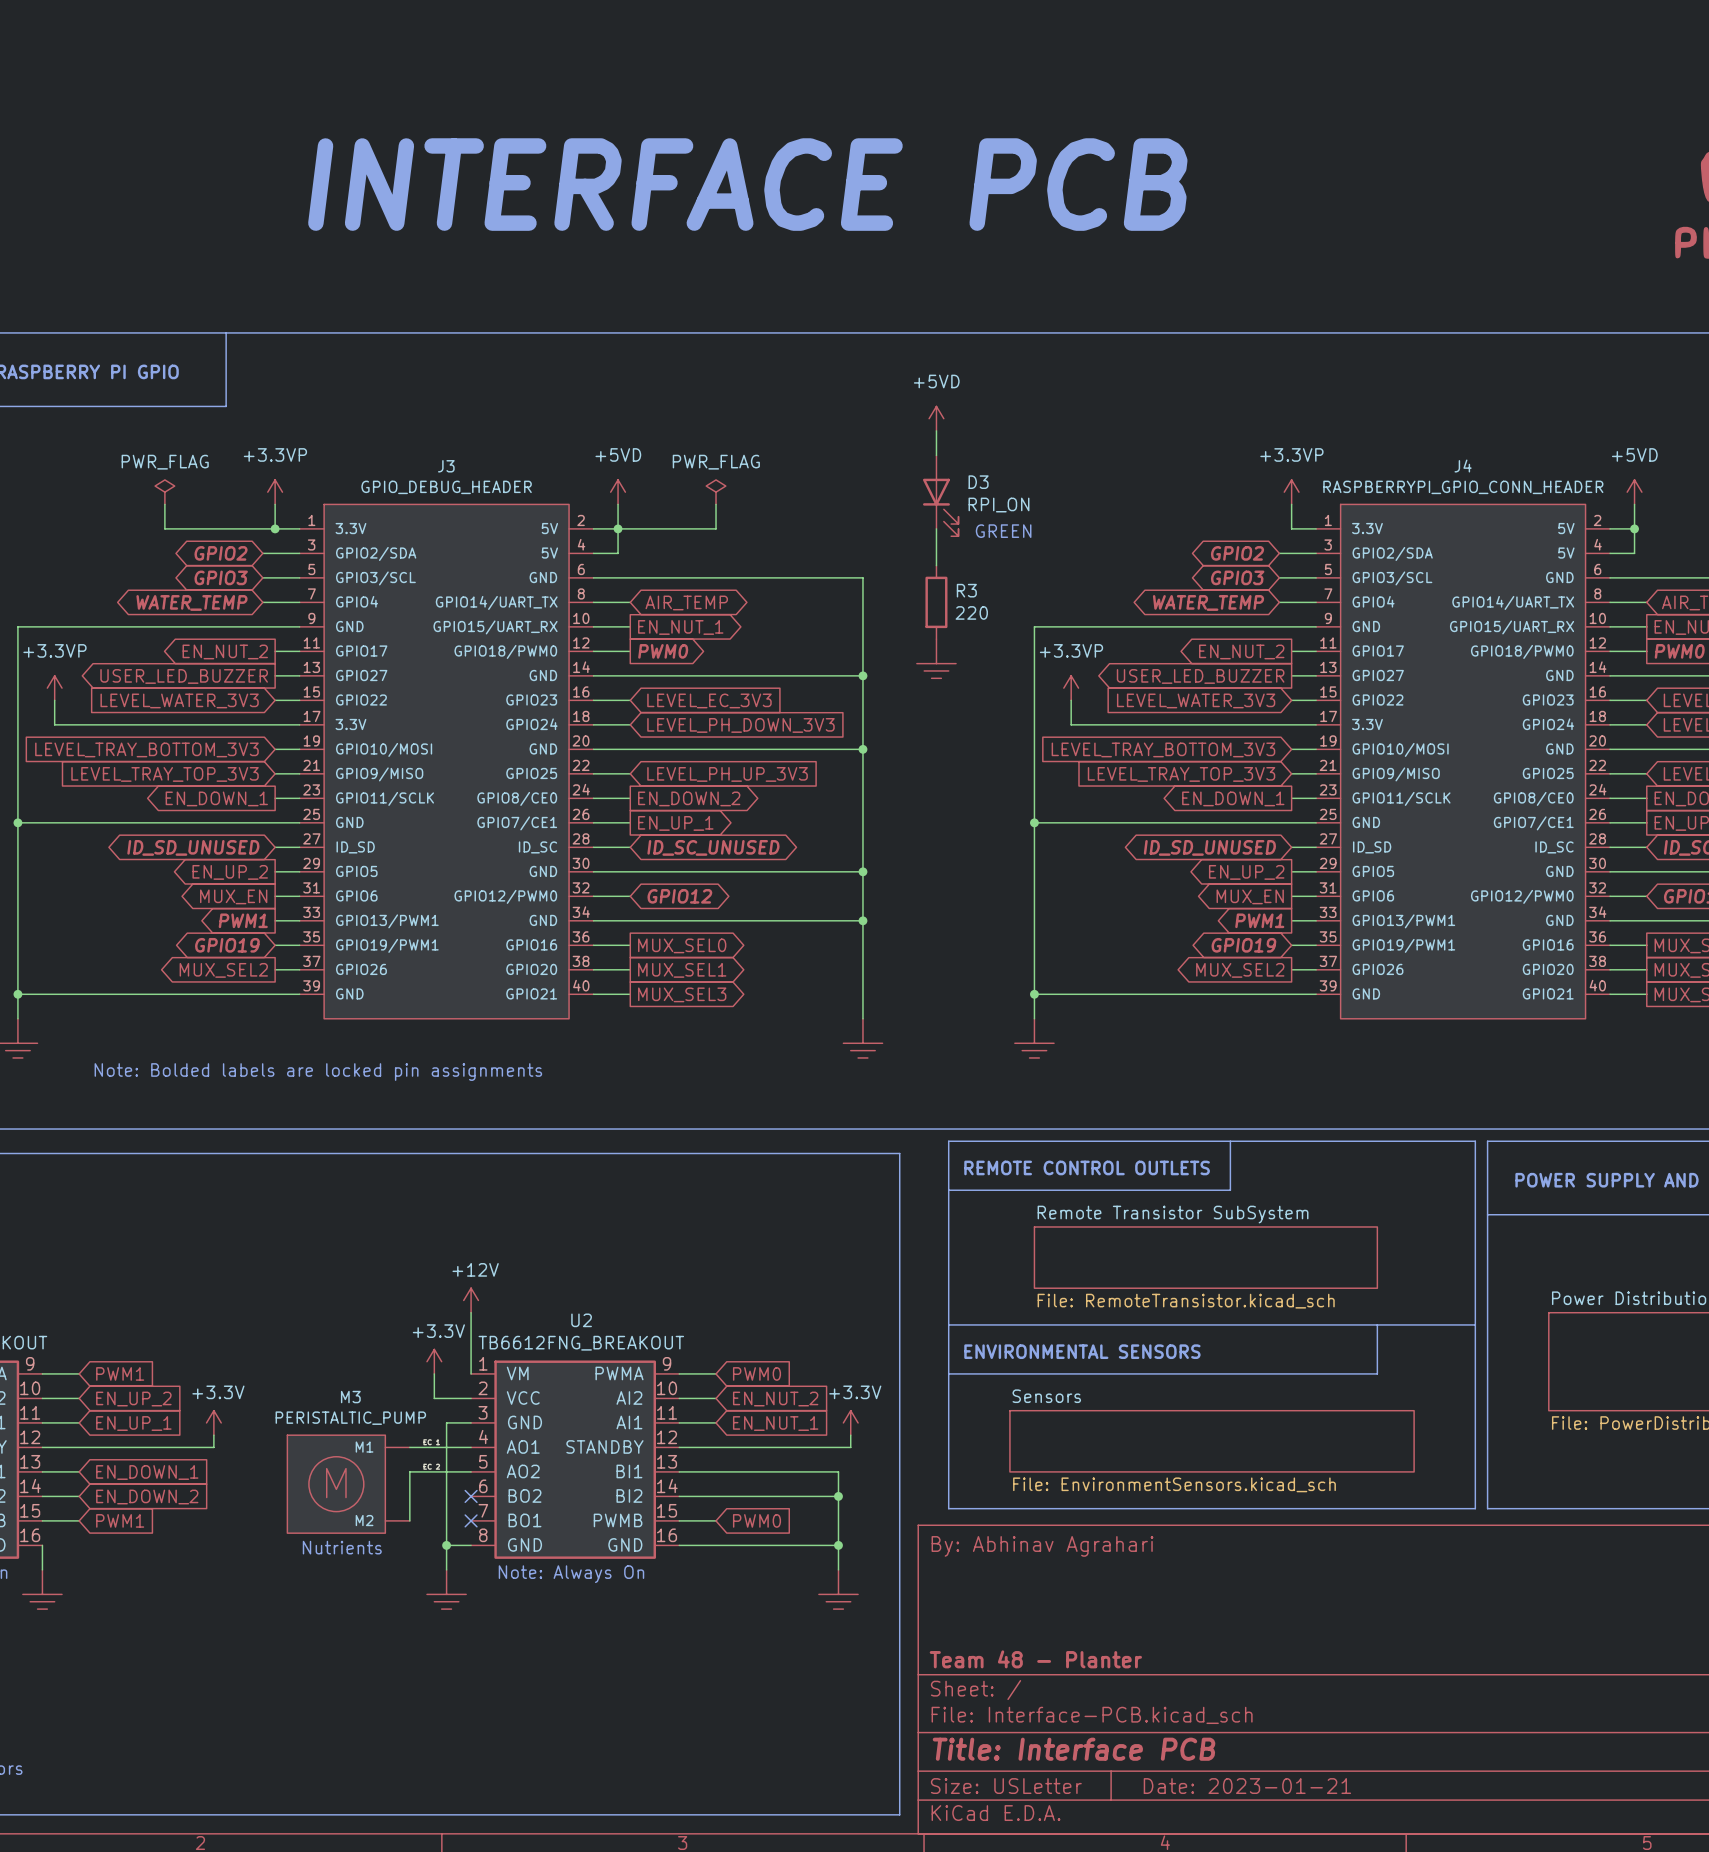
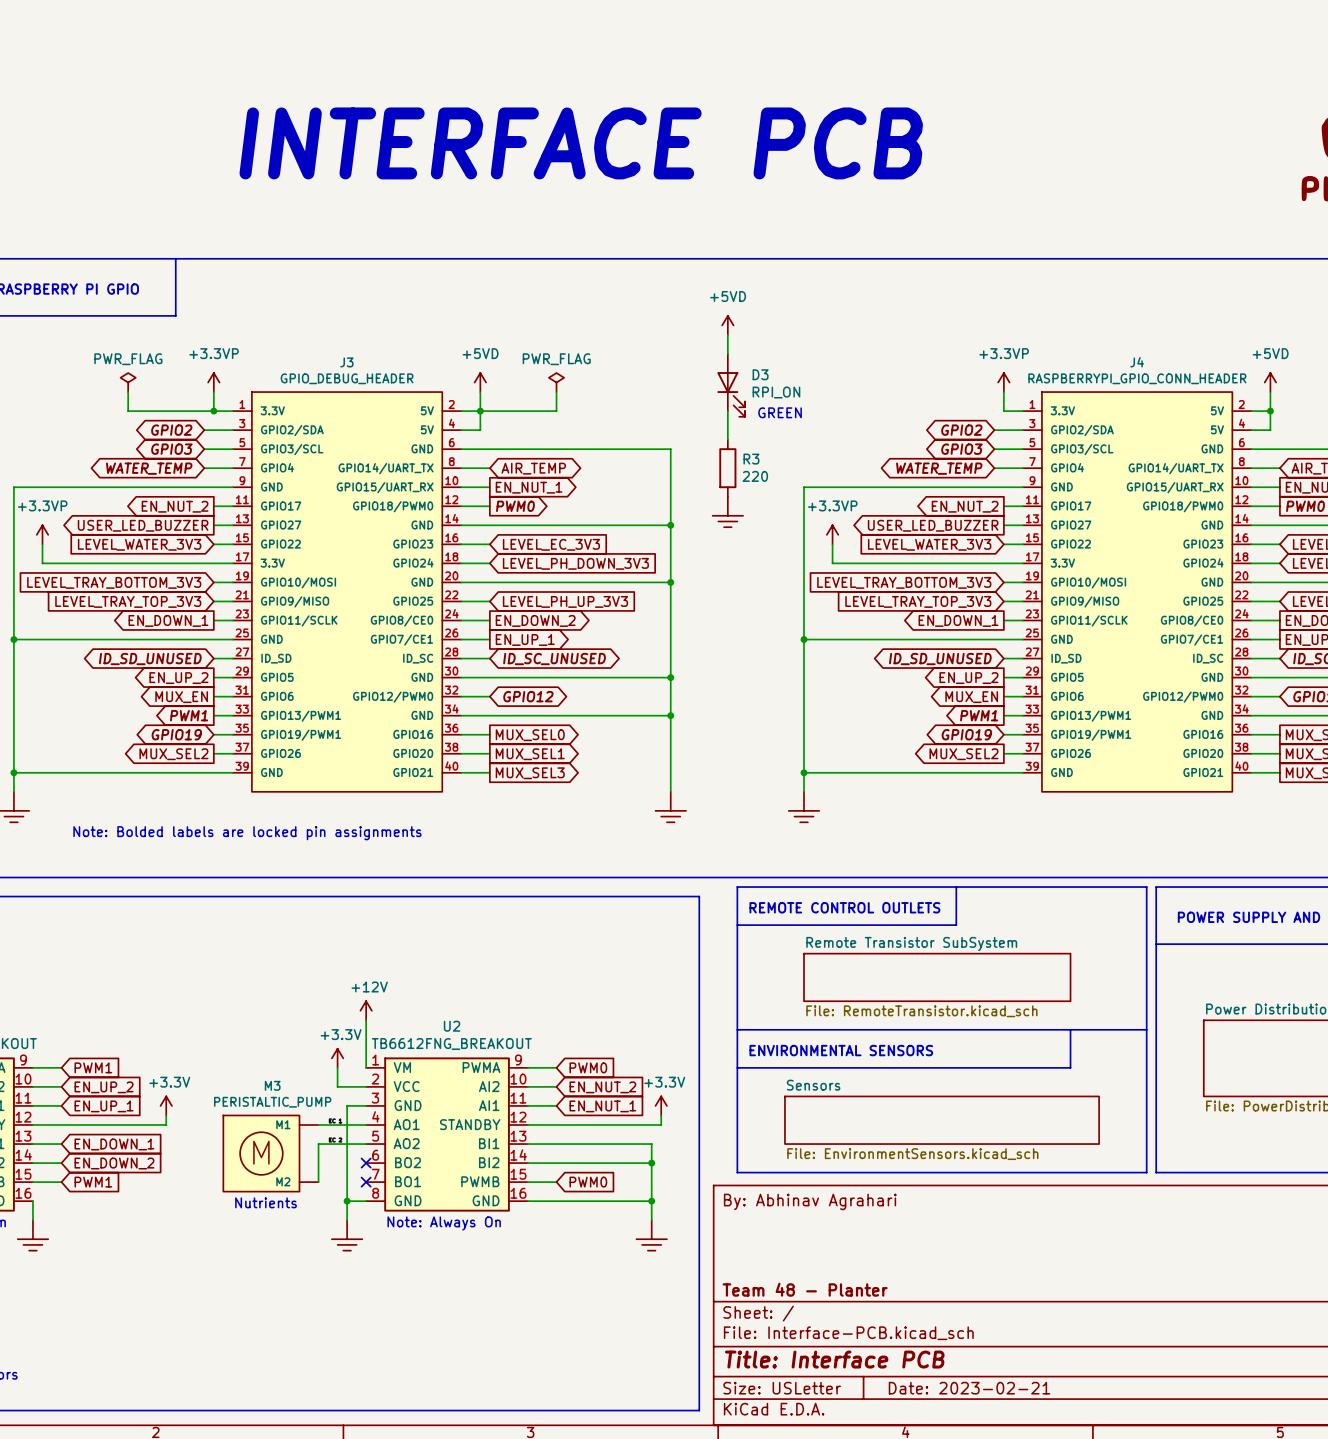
title block: Date: 2023-01-21 (1247, 1786) -> Date: 2023-02-21 (969, 1388)

